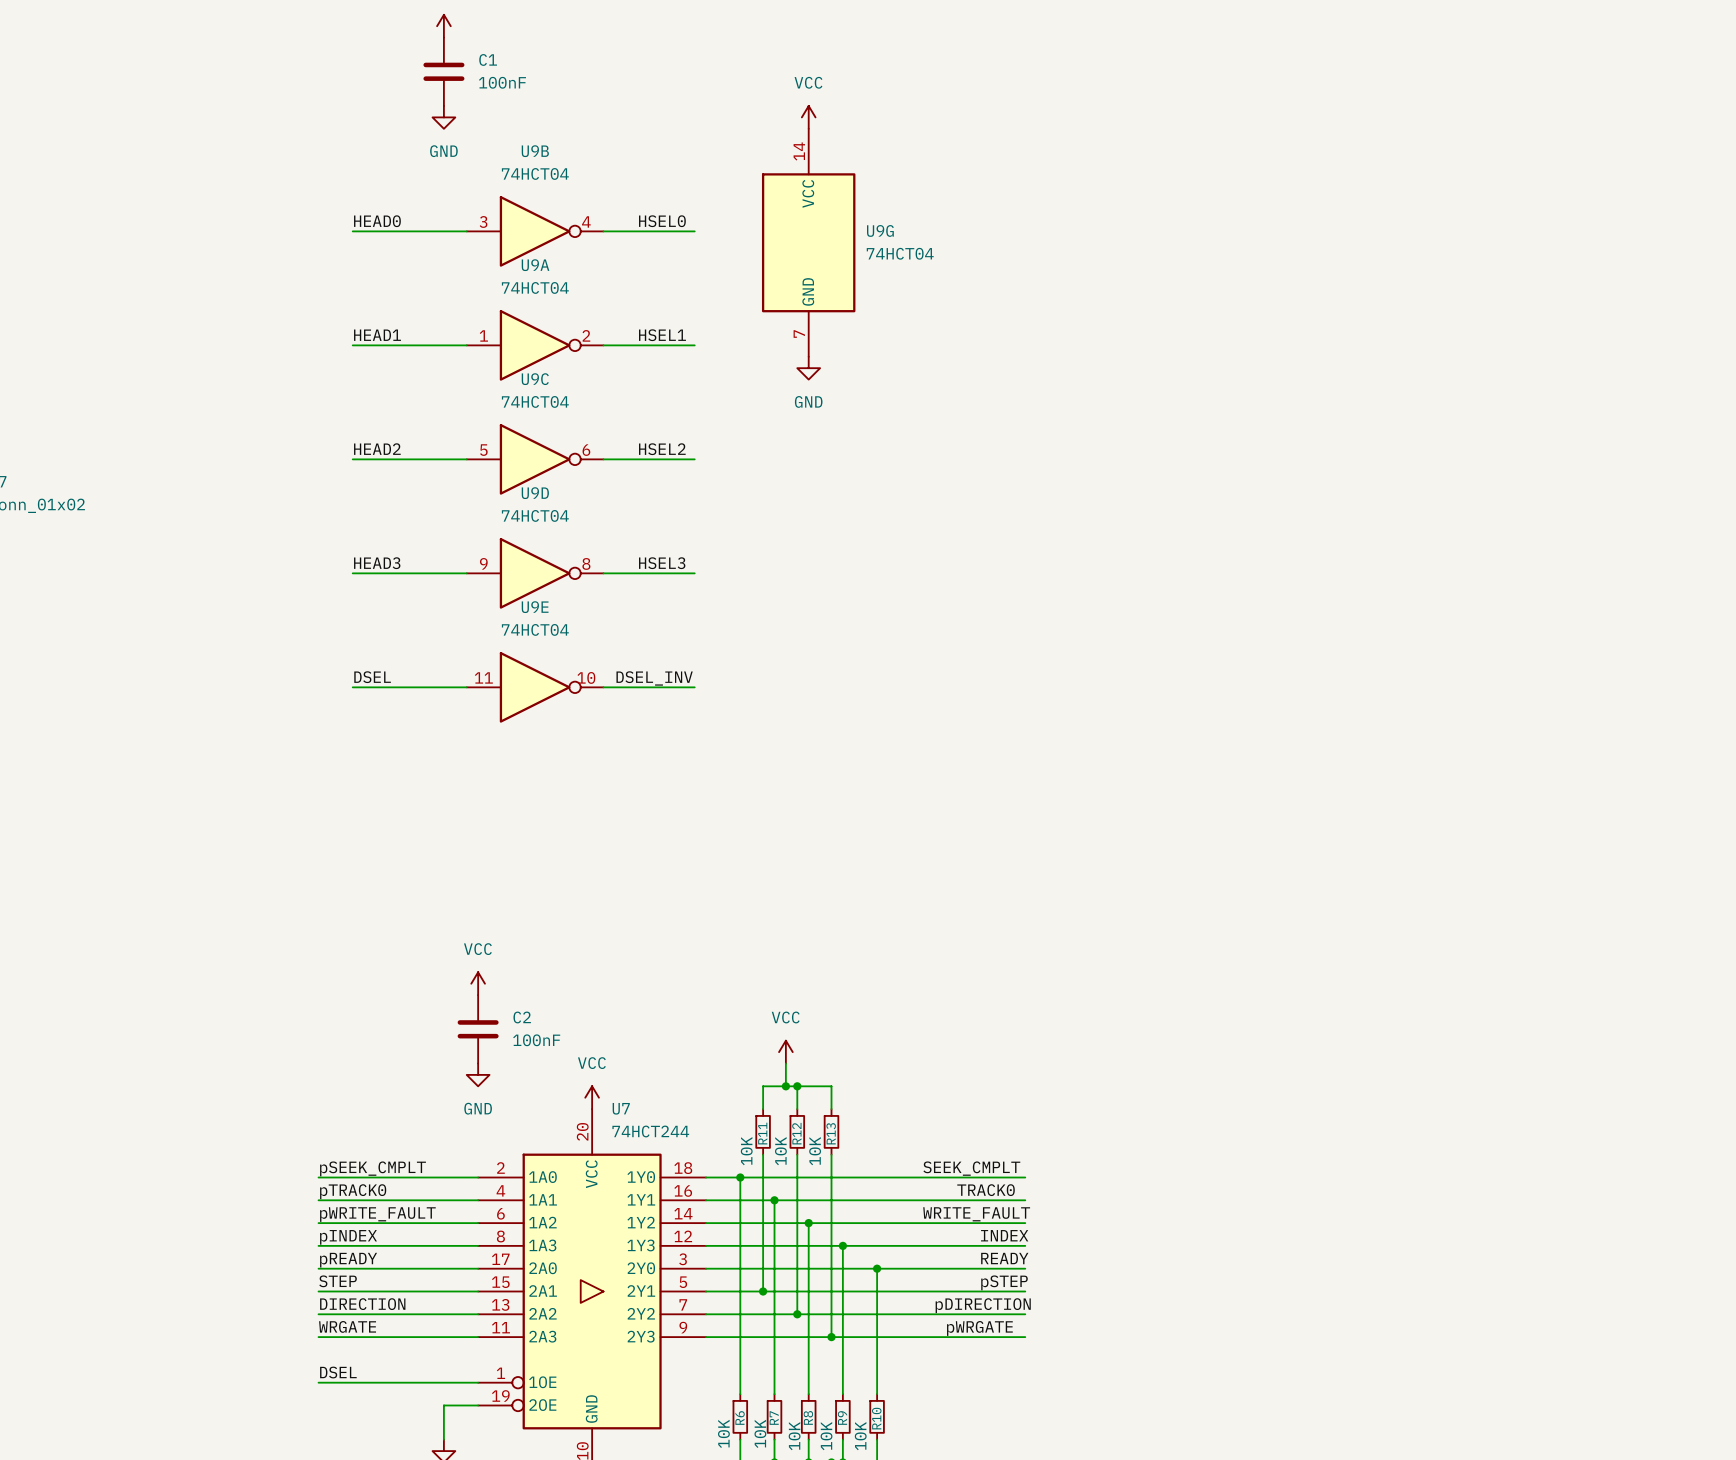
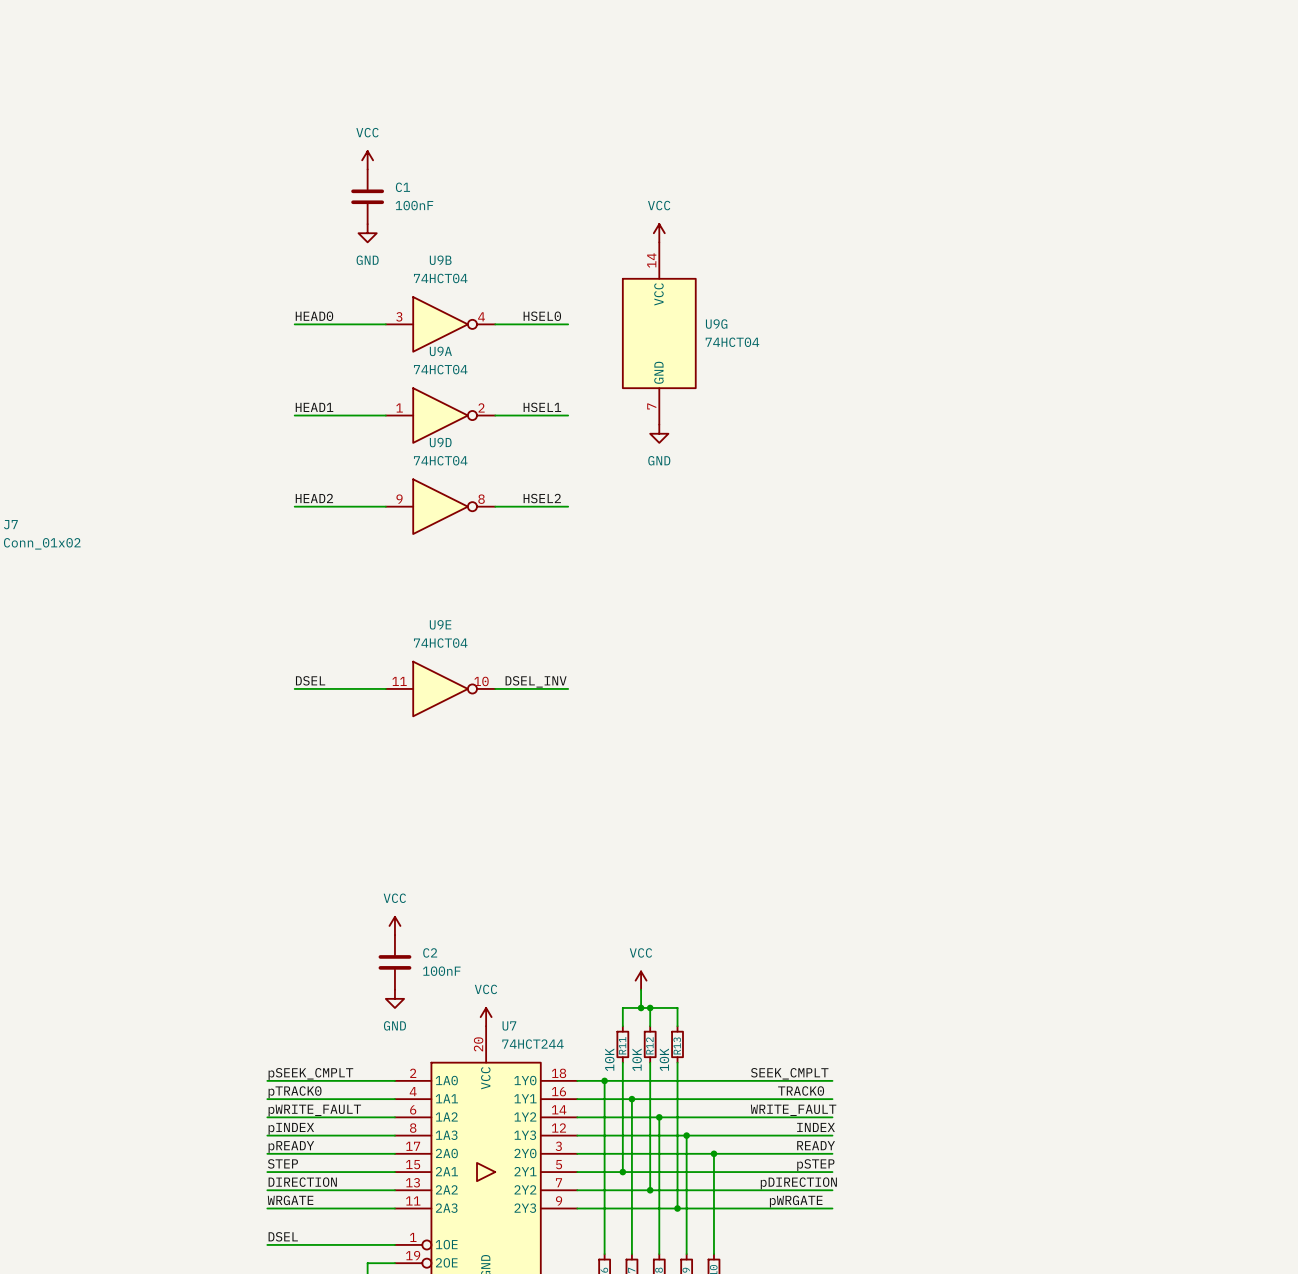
U9C: 74HCT04 (535, 459) -> none
label: HEAD3 (377, 563) -> none
label: HSEL3 (662, 563) -> none
wire: (352, 573) (466, 573) -> none
U9D position: (535, 573) -> (440, 506)
wire: (603, 573) (694, 573) -> none

